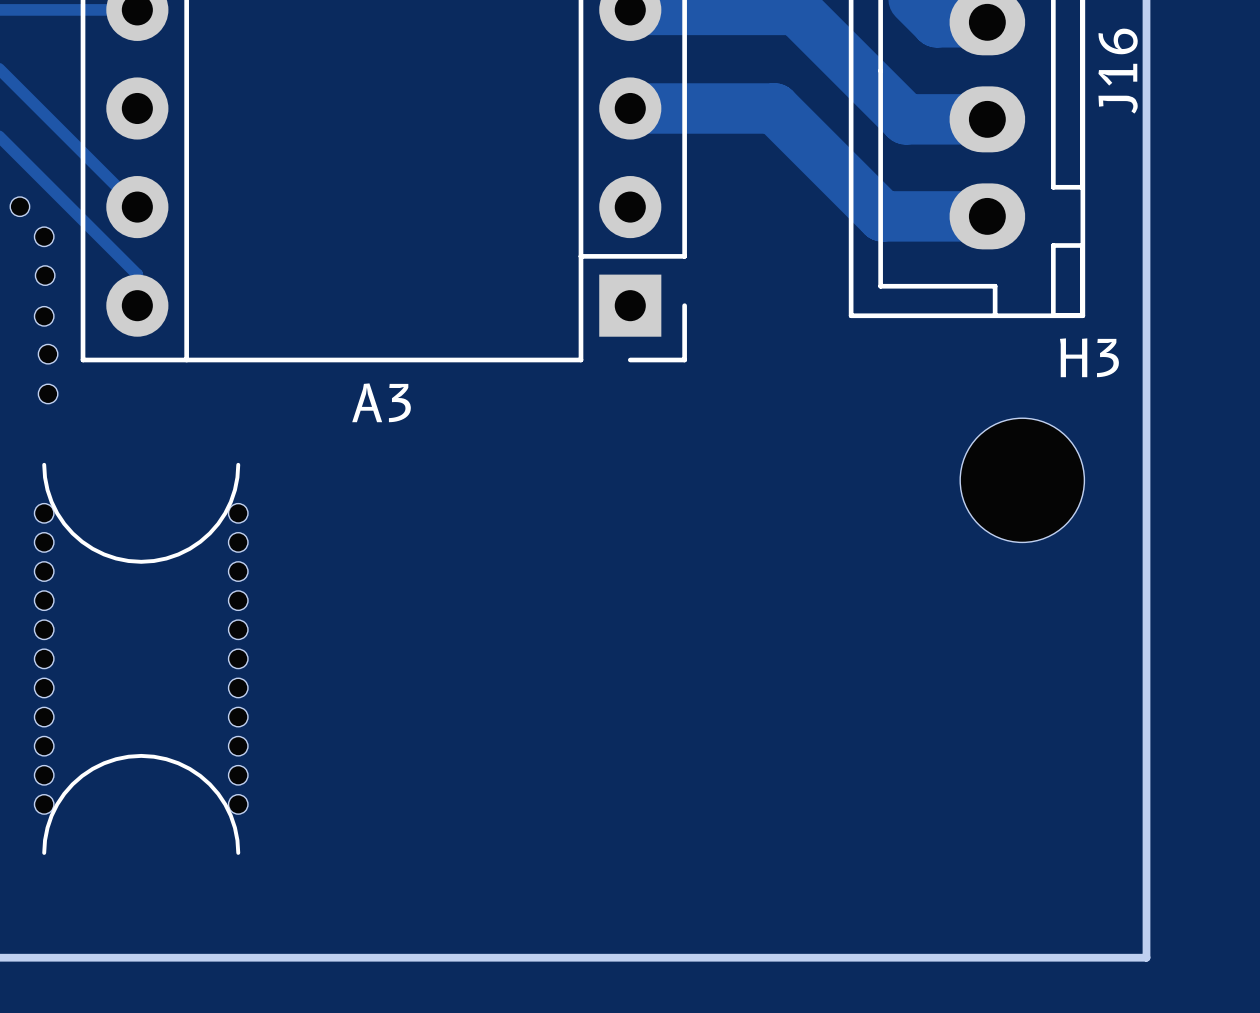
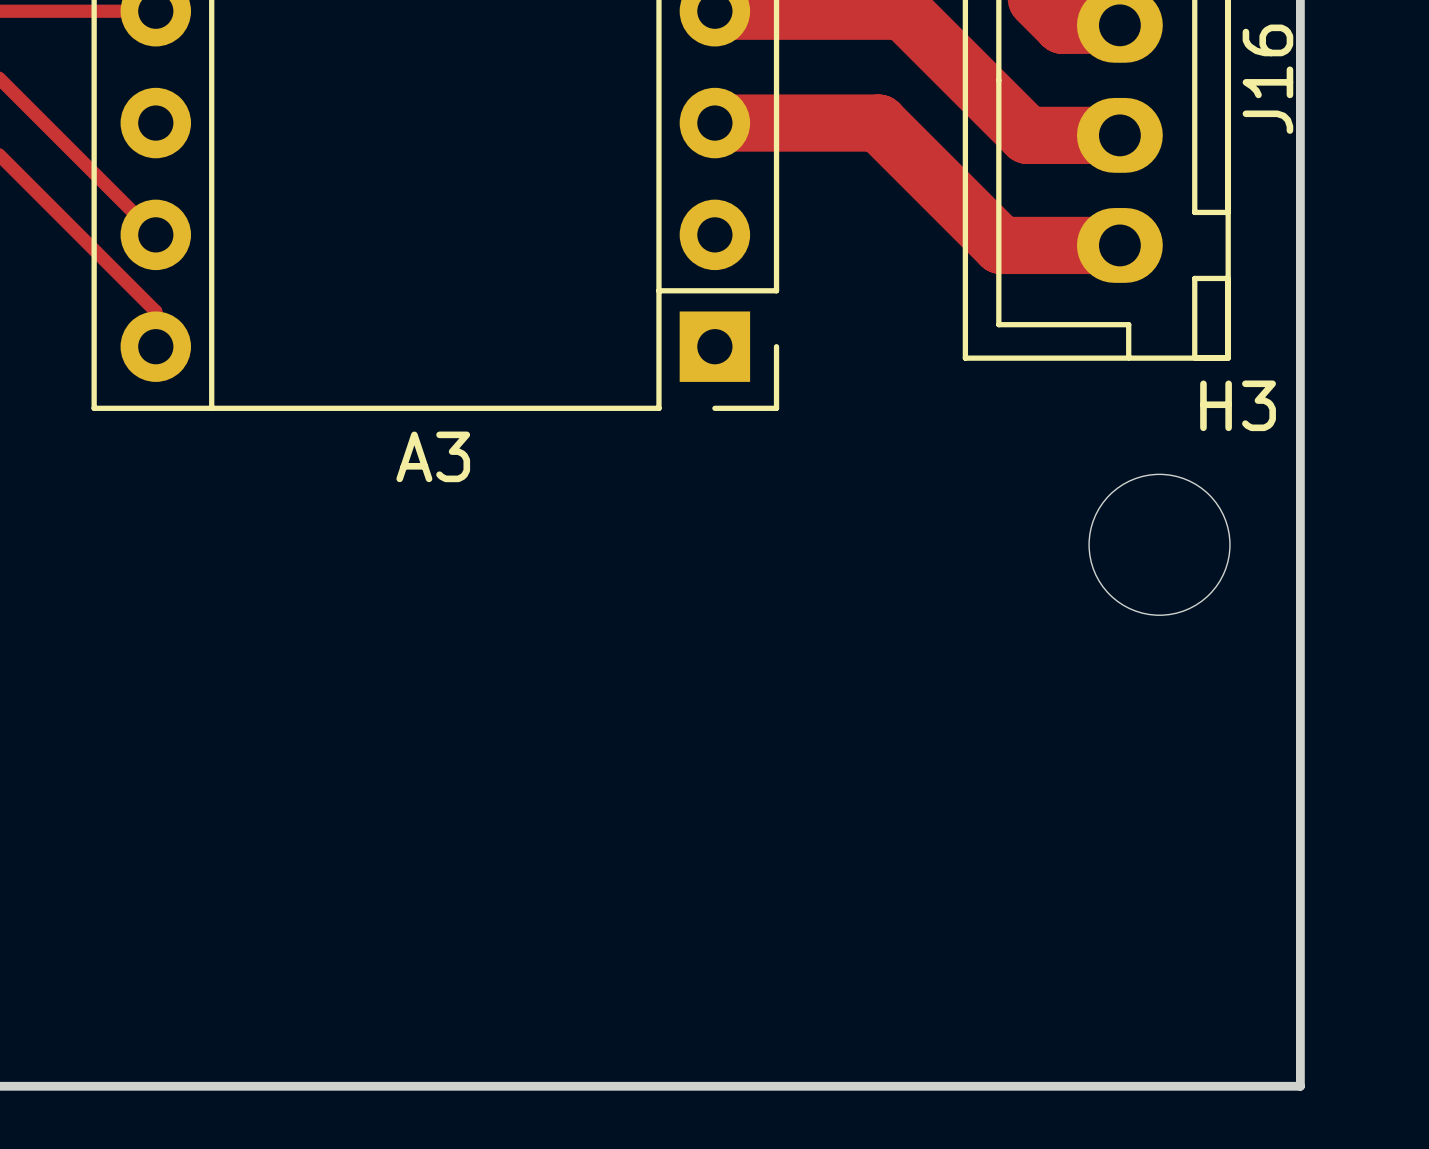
part: (19, 206) -> none
part: (44, 236) -> none
part: (45, 275) -> none
part: (44, 316) -> none
part: (48, 354) -> none
part: (48, 393) -> none
part: (141, 658) -> none

